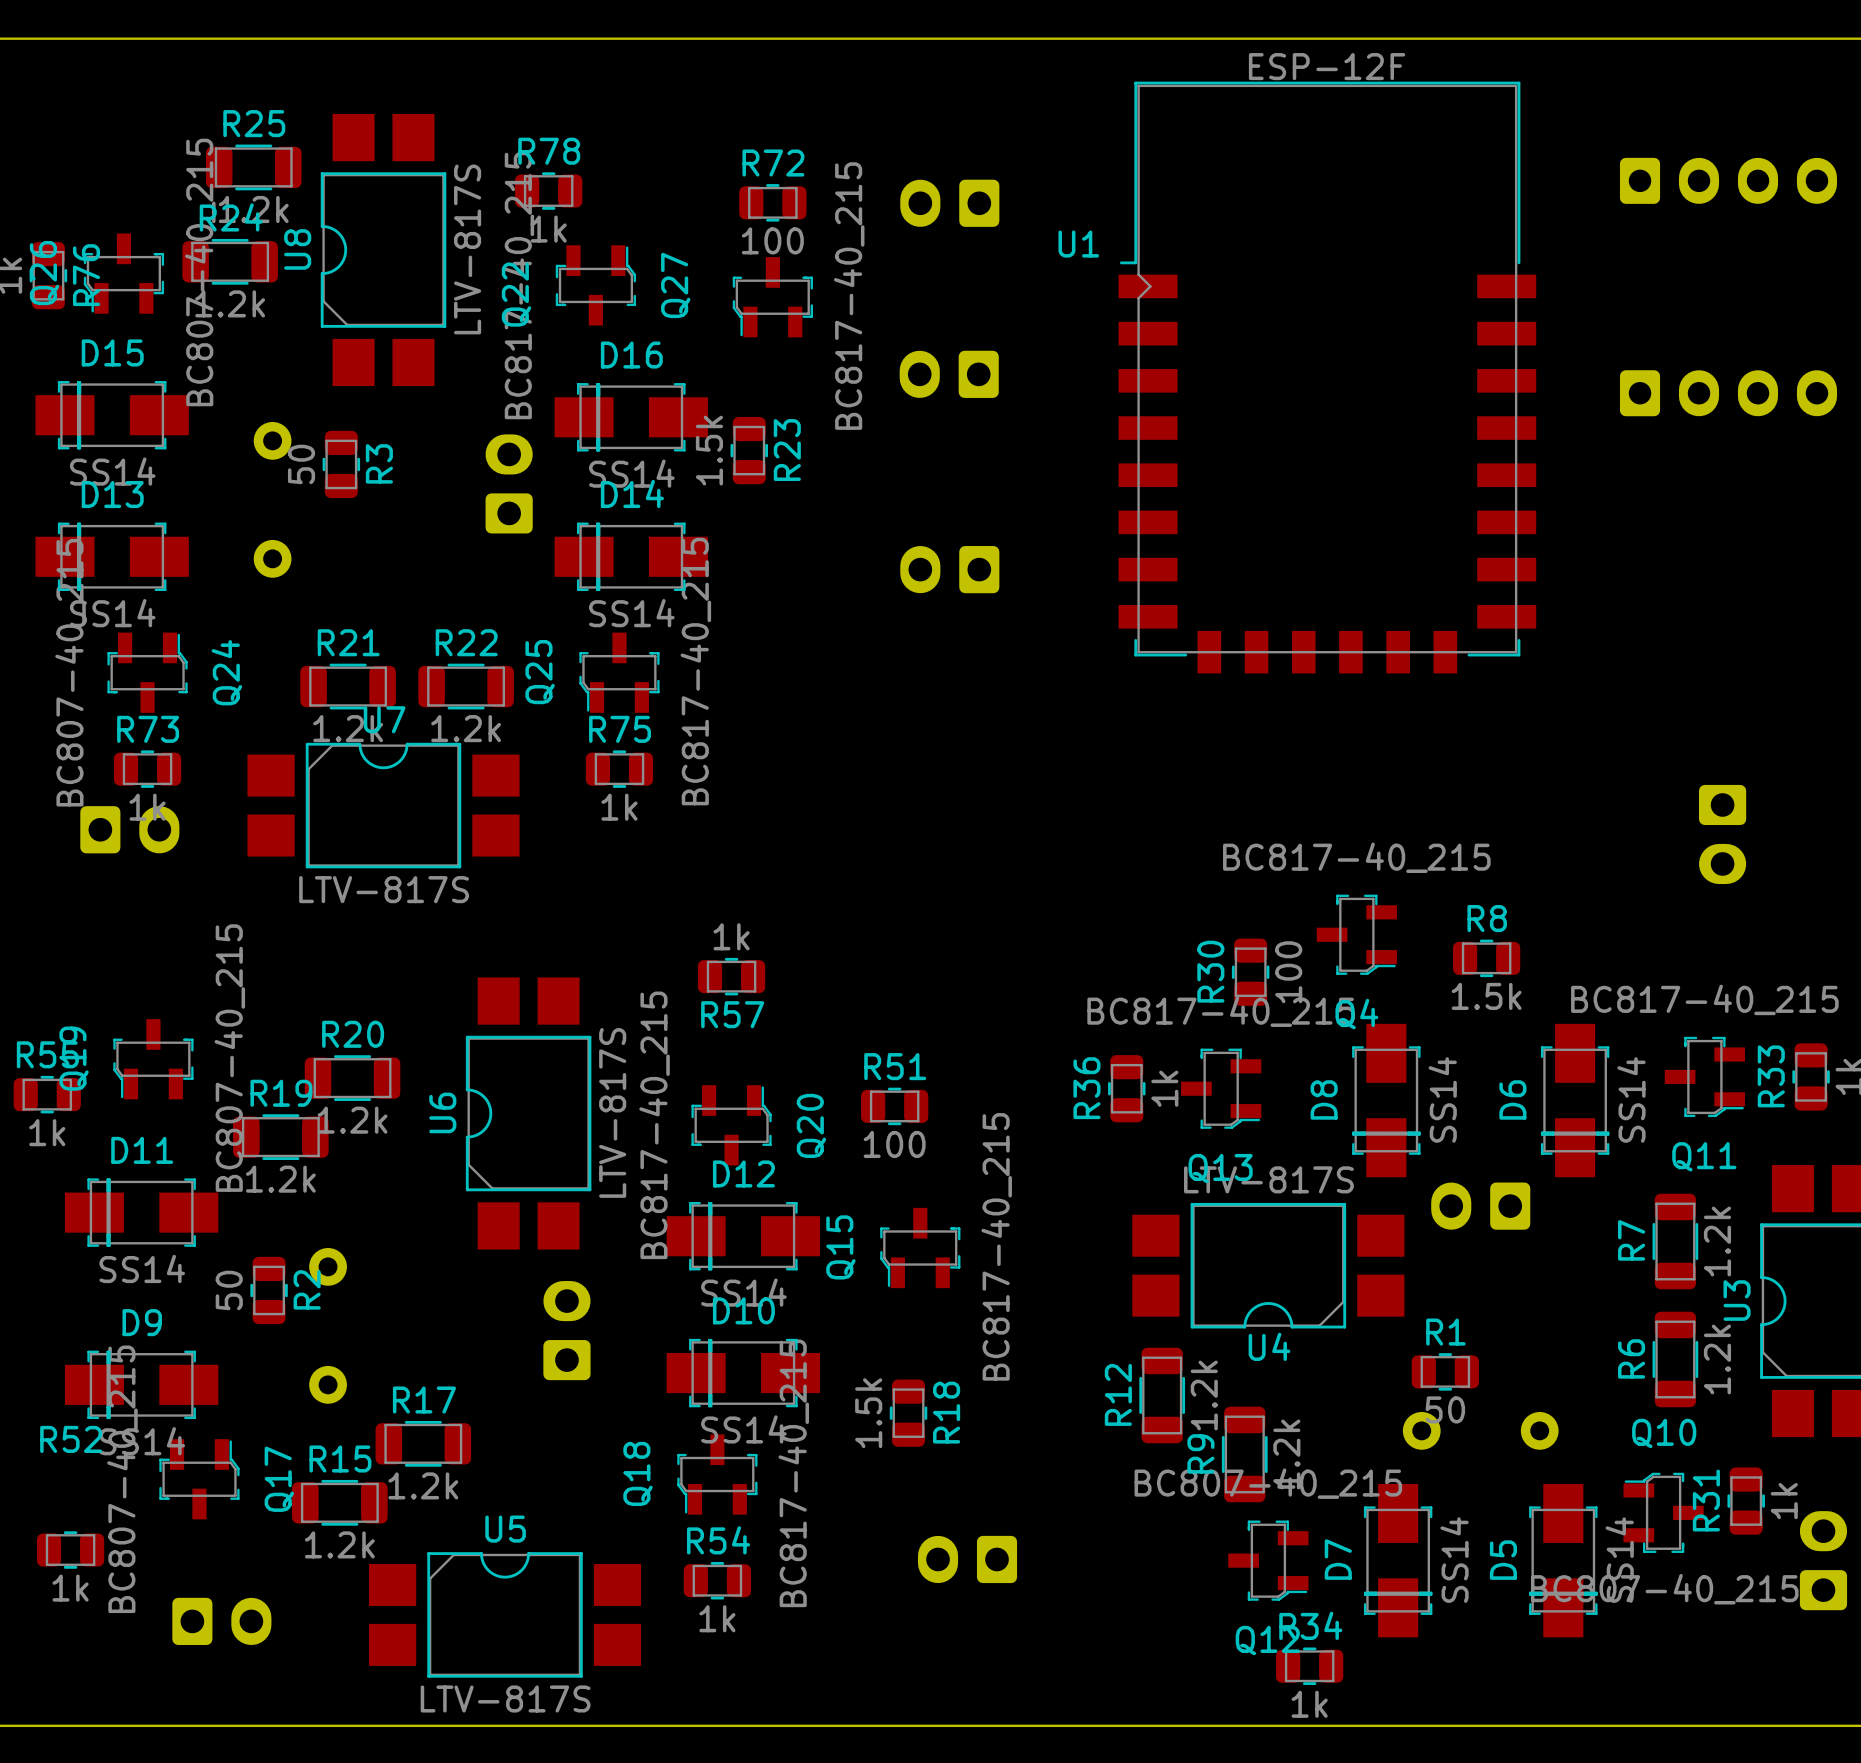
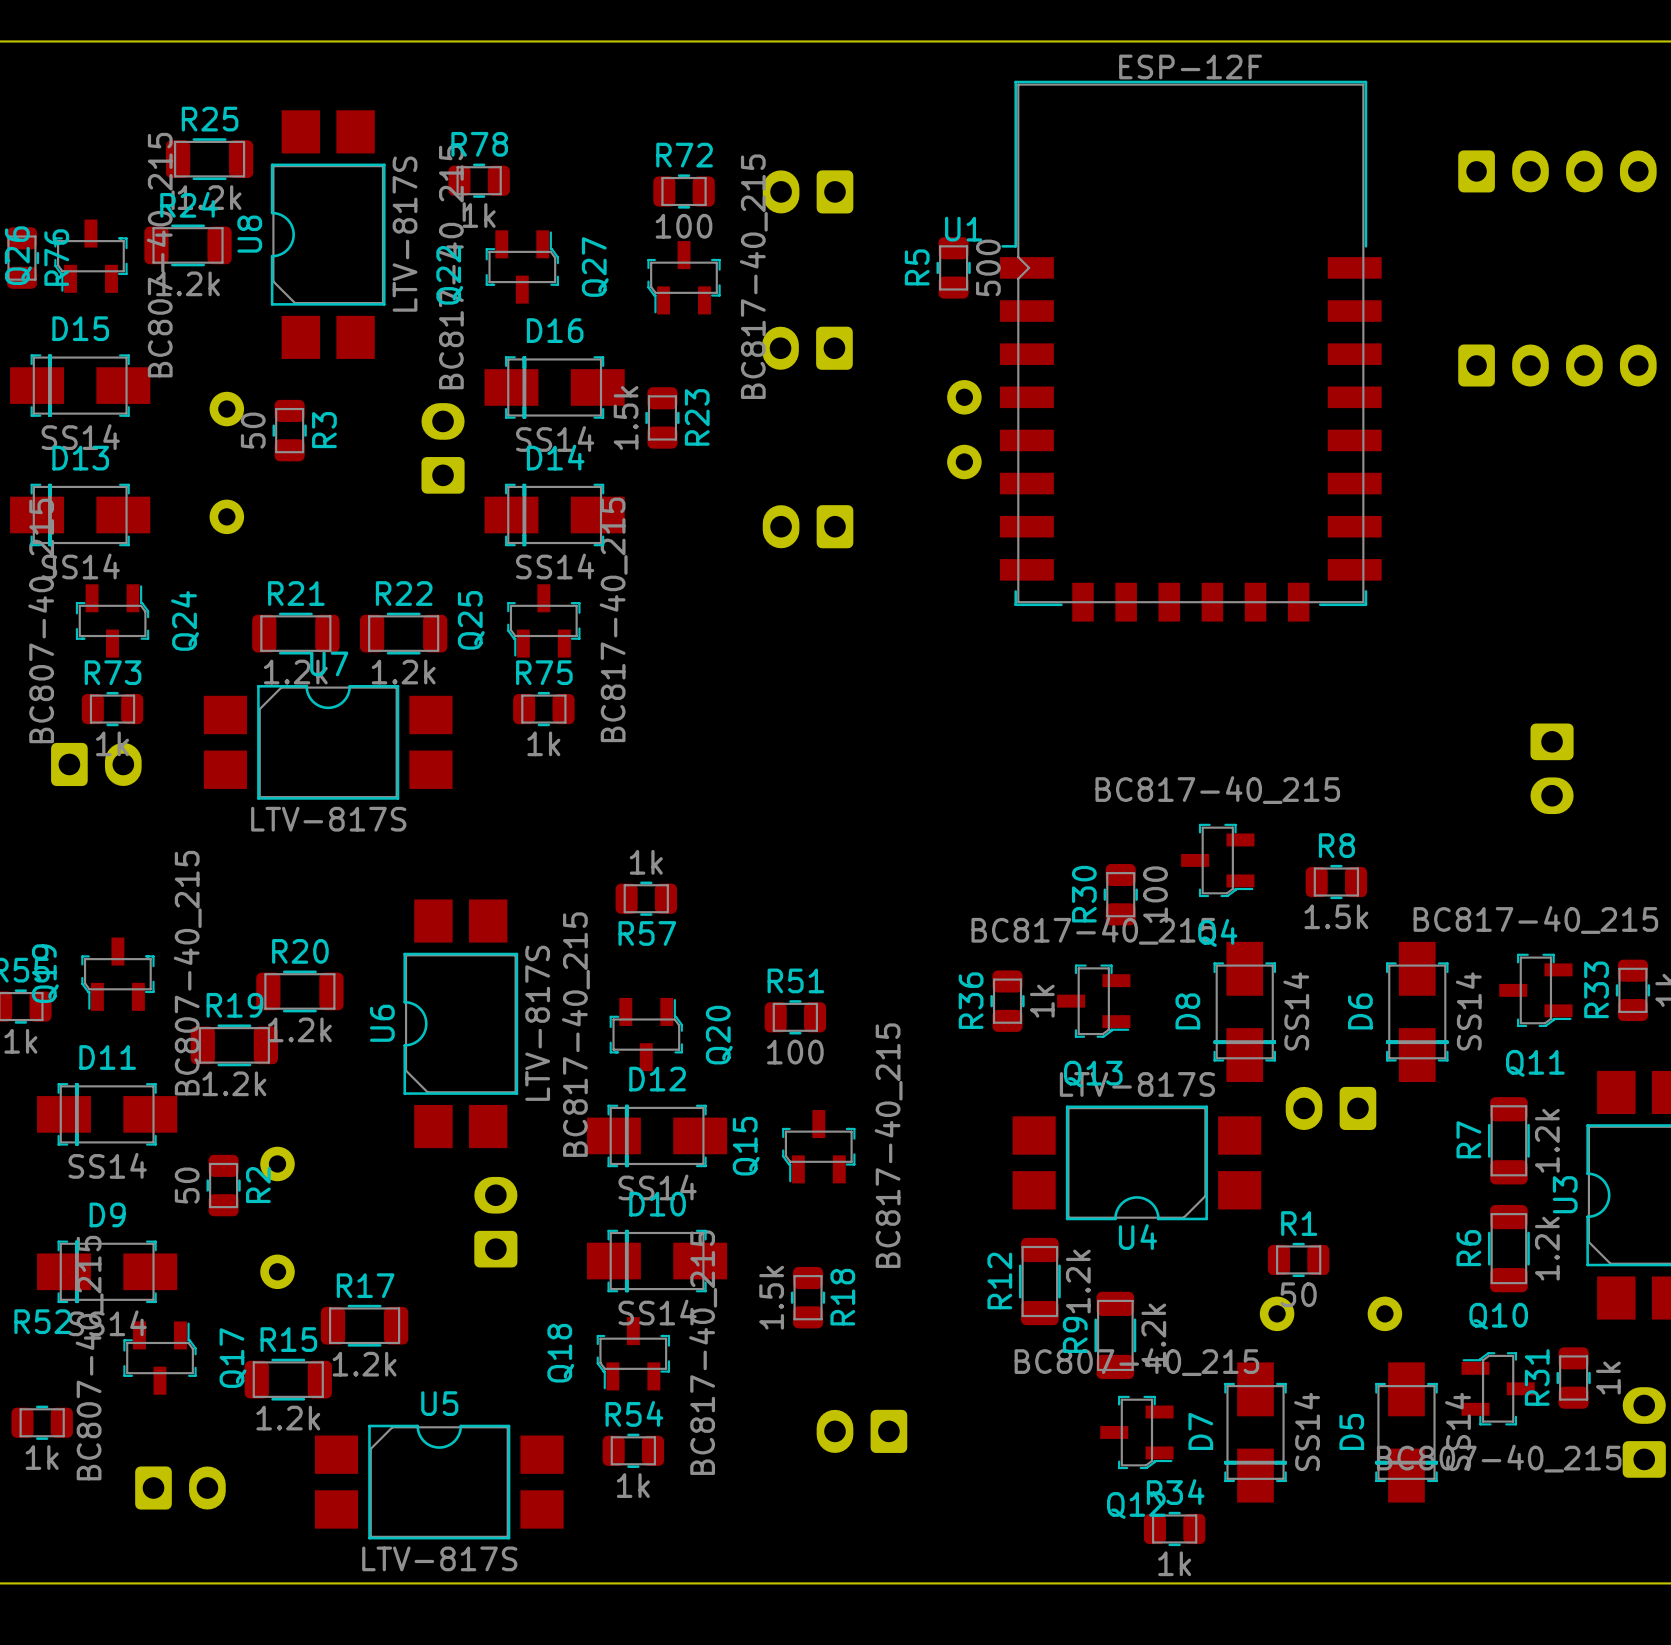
part position: (949, 203) -> (808, 191)
R5: none -> 500 (953, 267)
part position: (949, 374) -> (807, 348)
part: none -> (964, 429)
part position: (949, 569) -> (808, 526)

